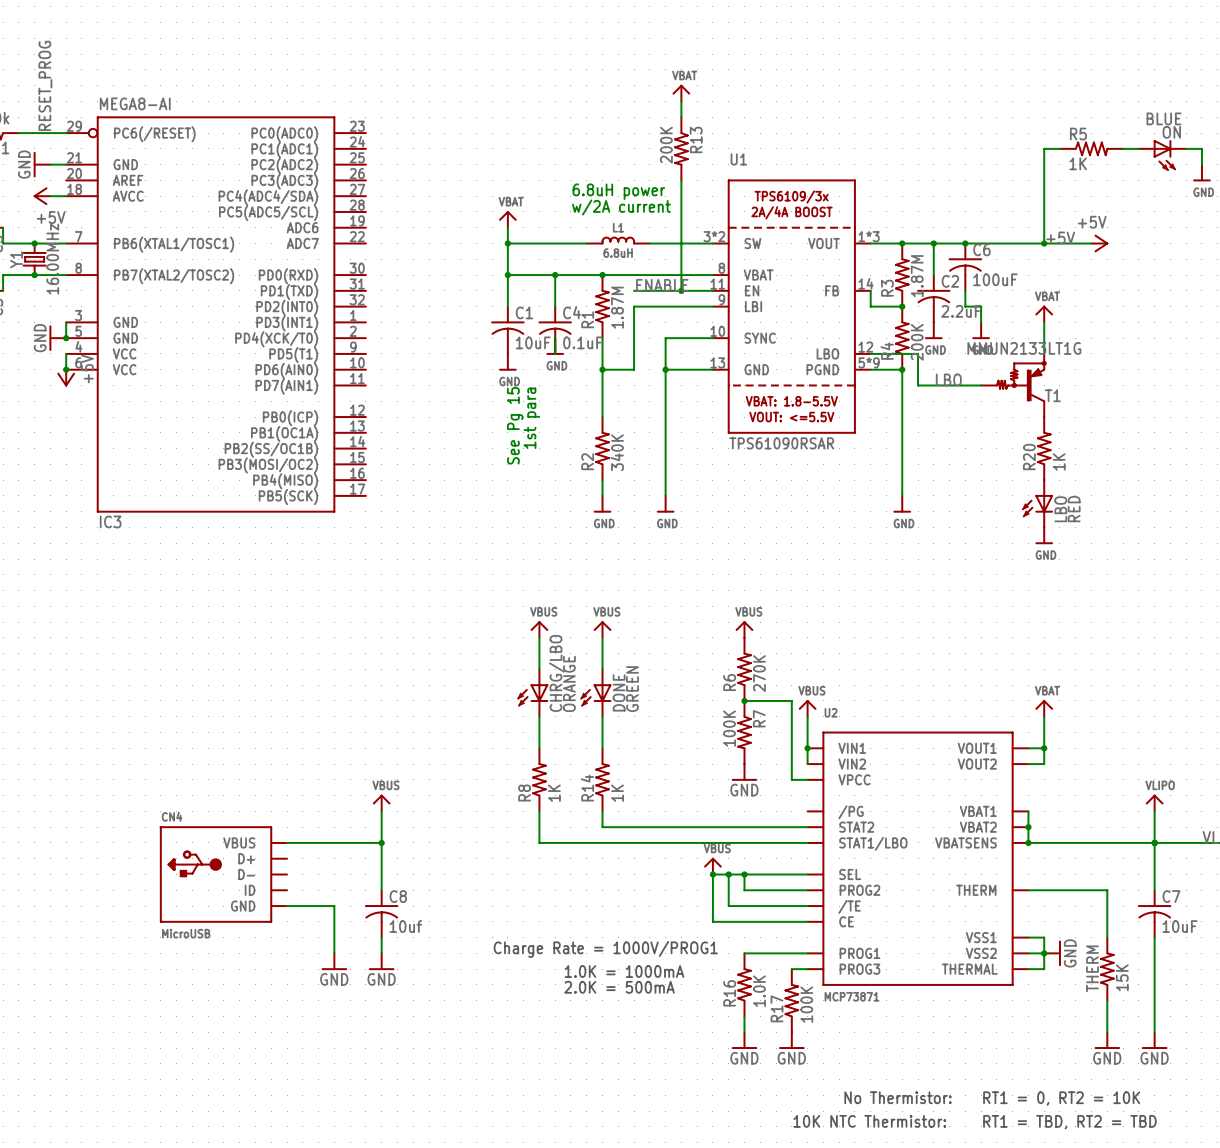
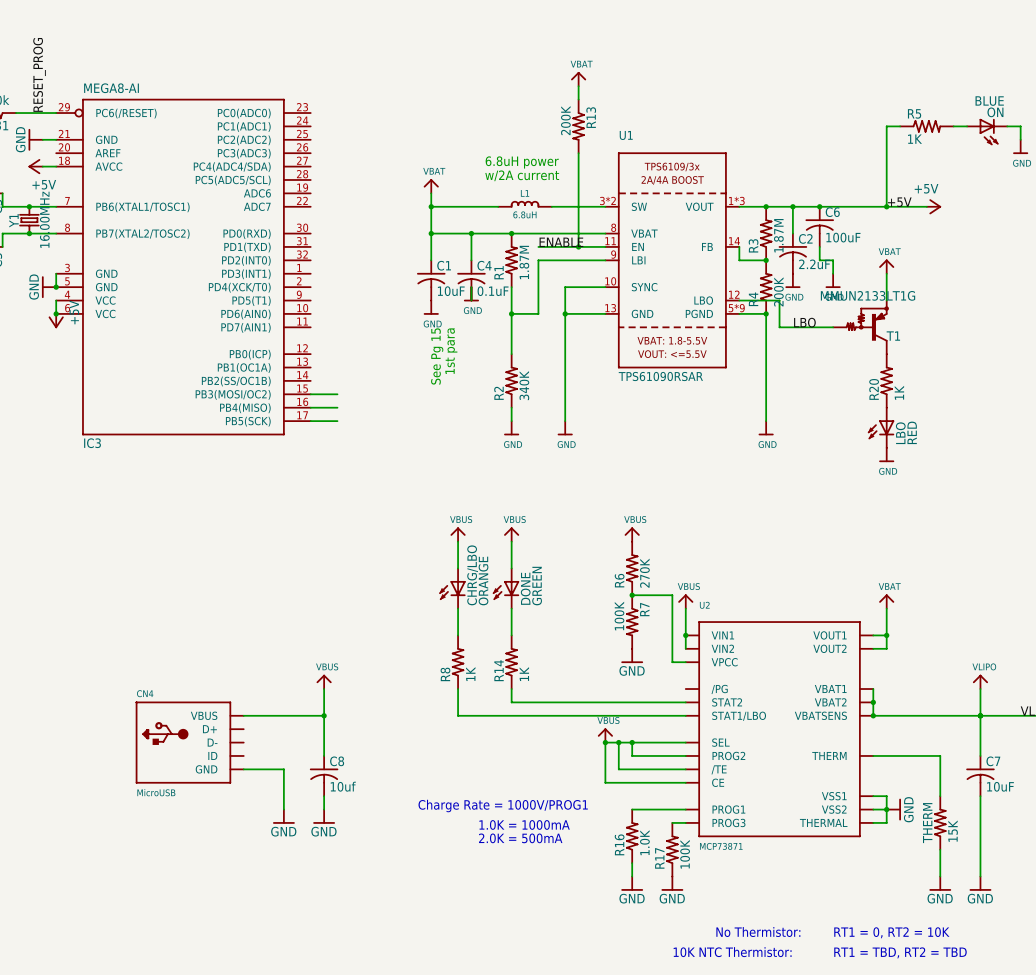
wire: none -> (310, 394) (337, 394)
wire: none -> (310, 407) (337, 407)
wire: none -> (310, 421) (337, 421)

